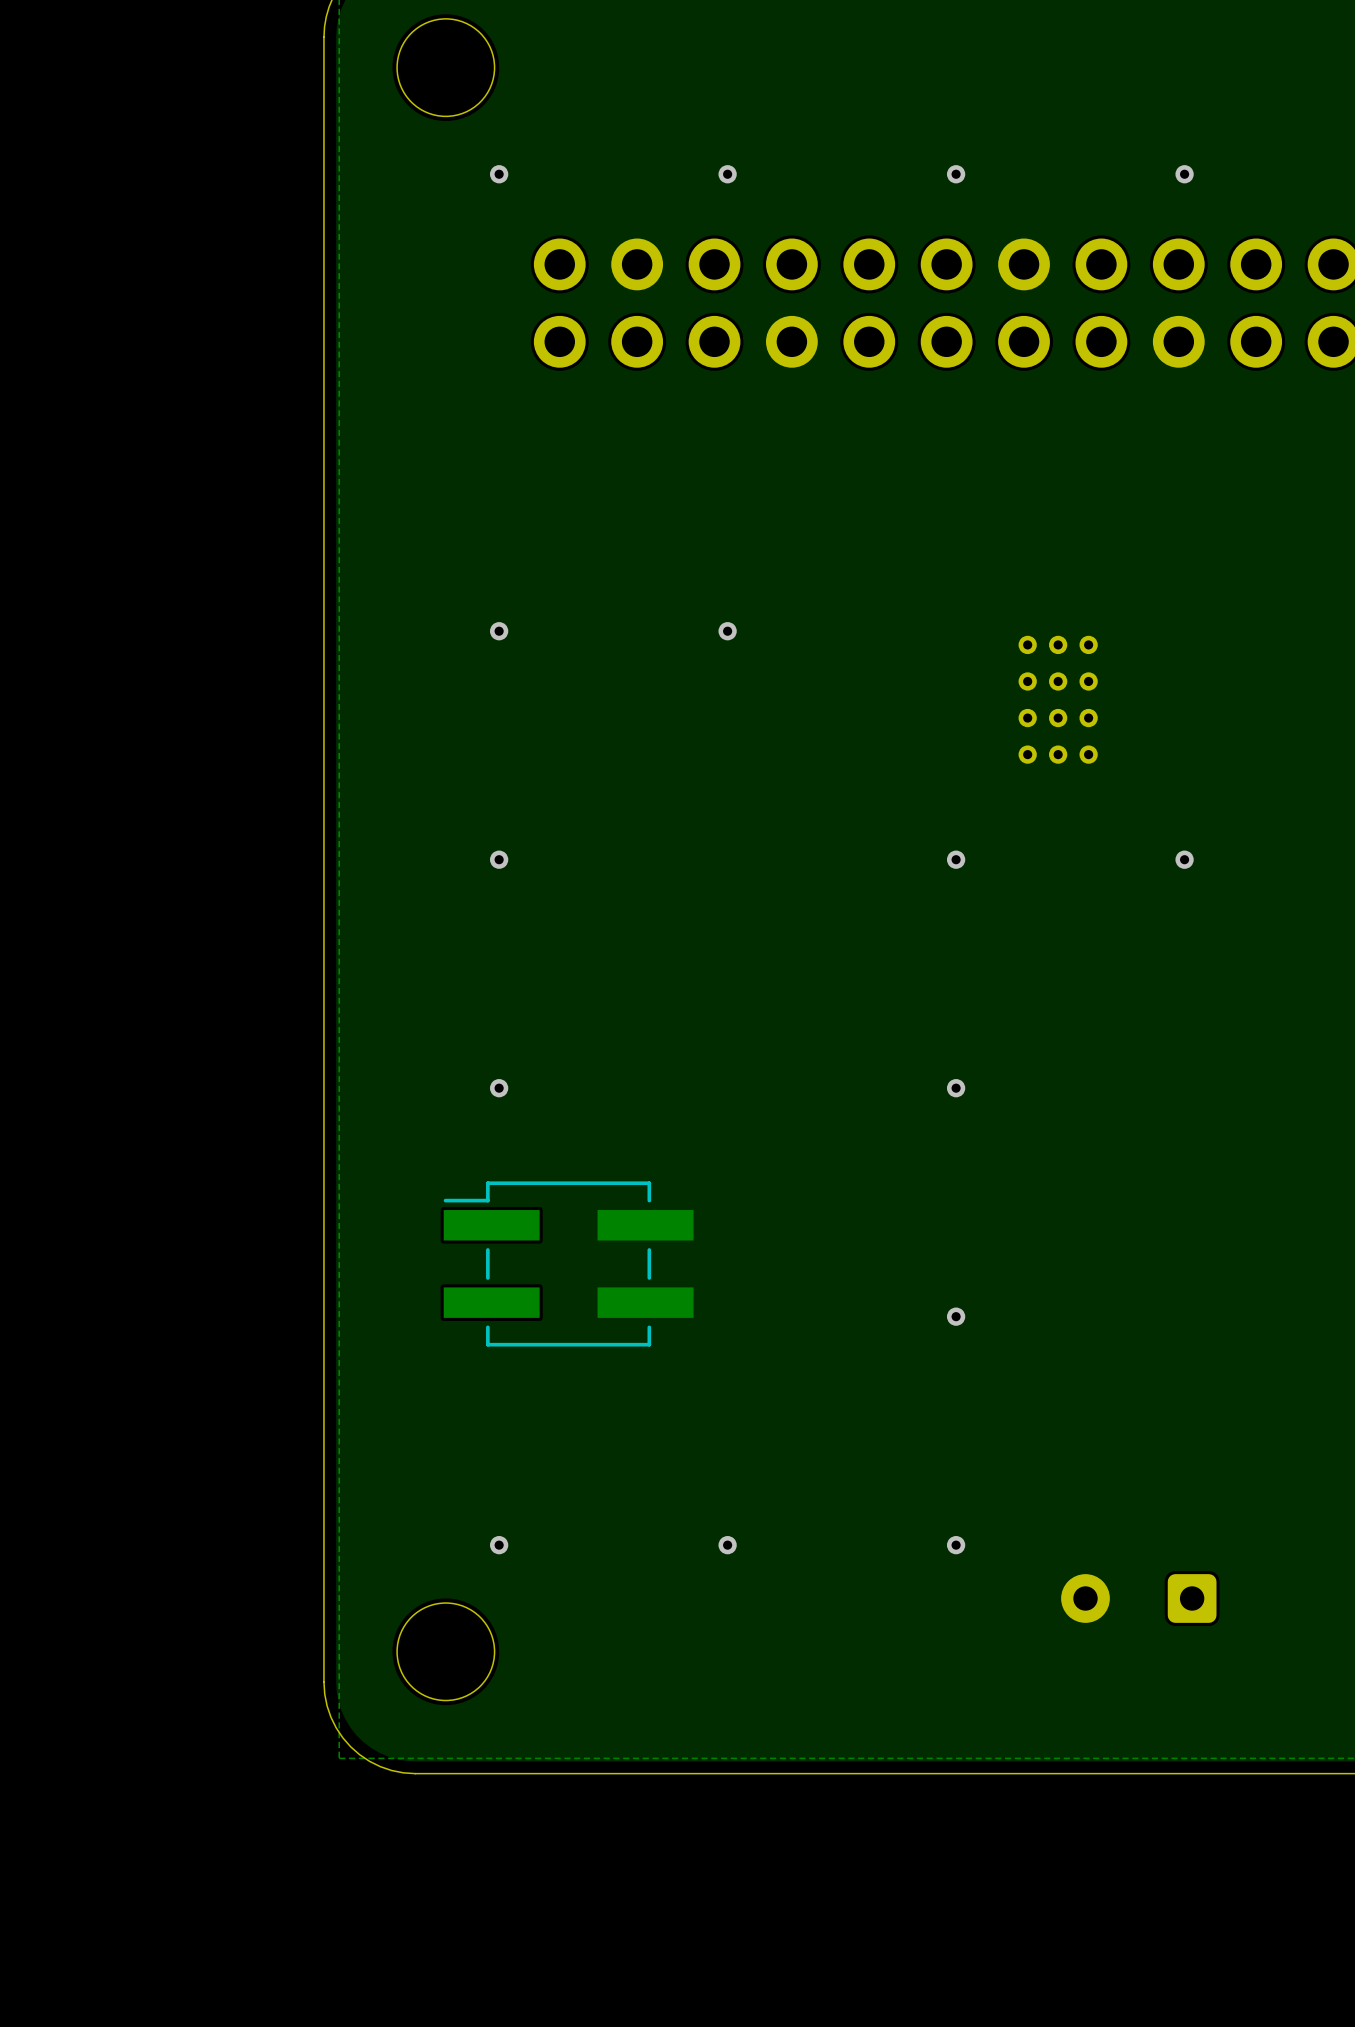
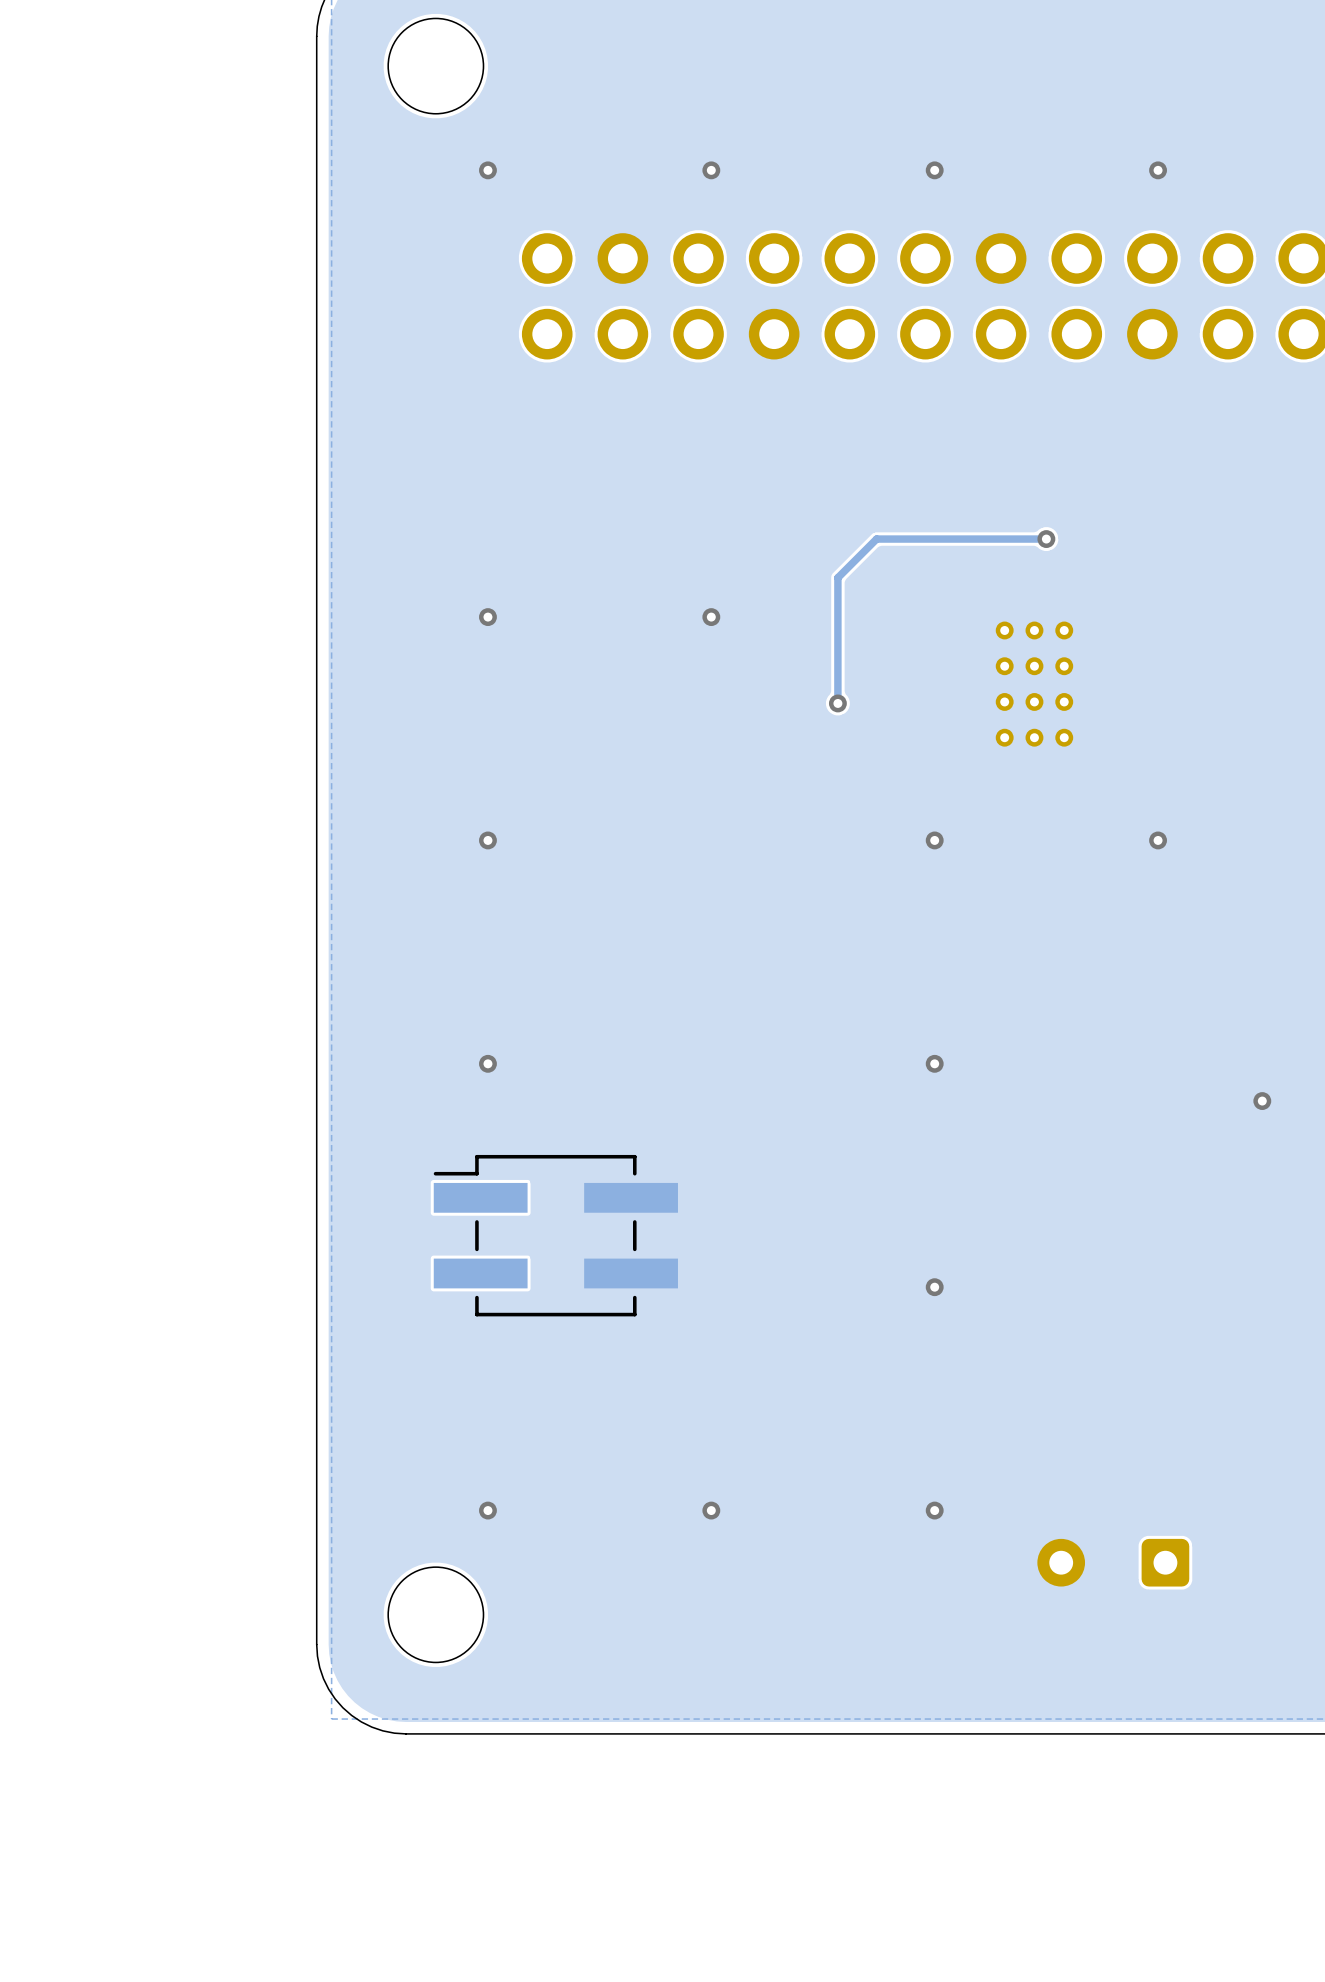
track: none -> (1046, 539) (876, 539) (837, 577) (837, 703)
via: none -> (1046, 539)
via: none -> (837, 703)
via: none -> (1262, 1101)

